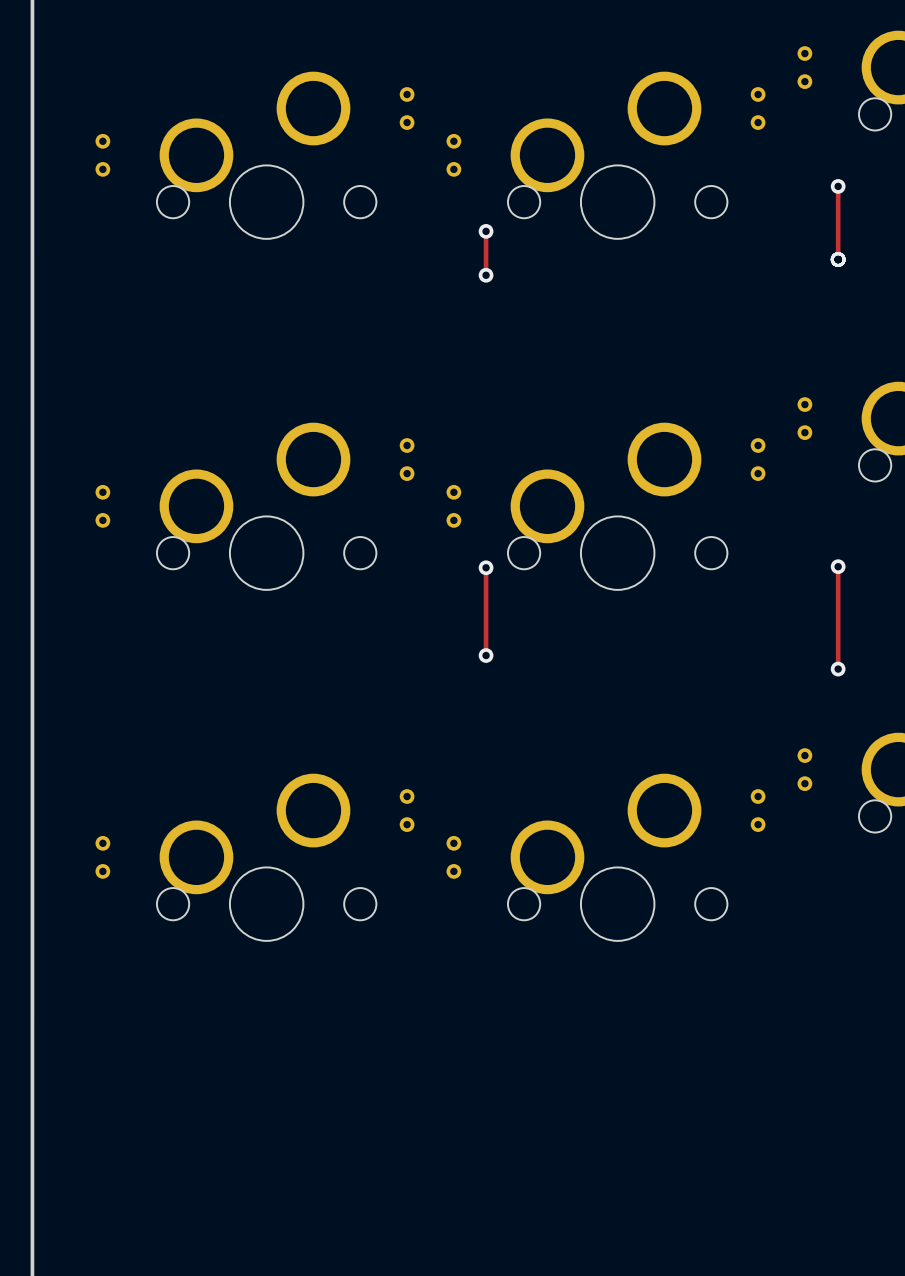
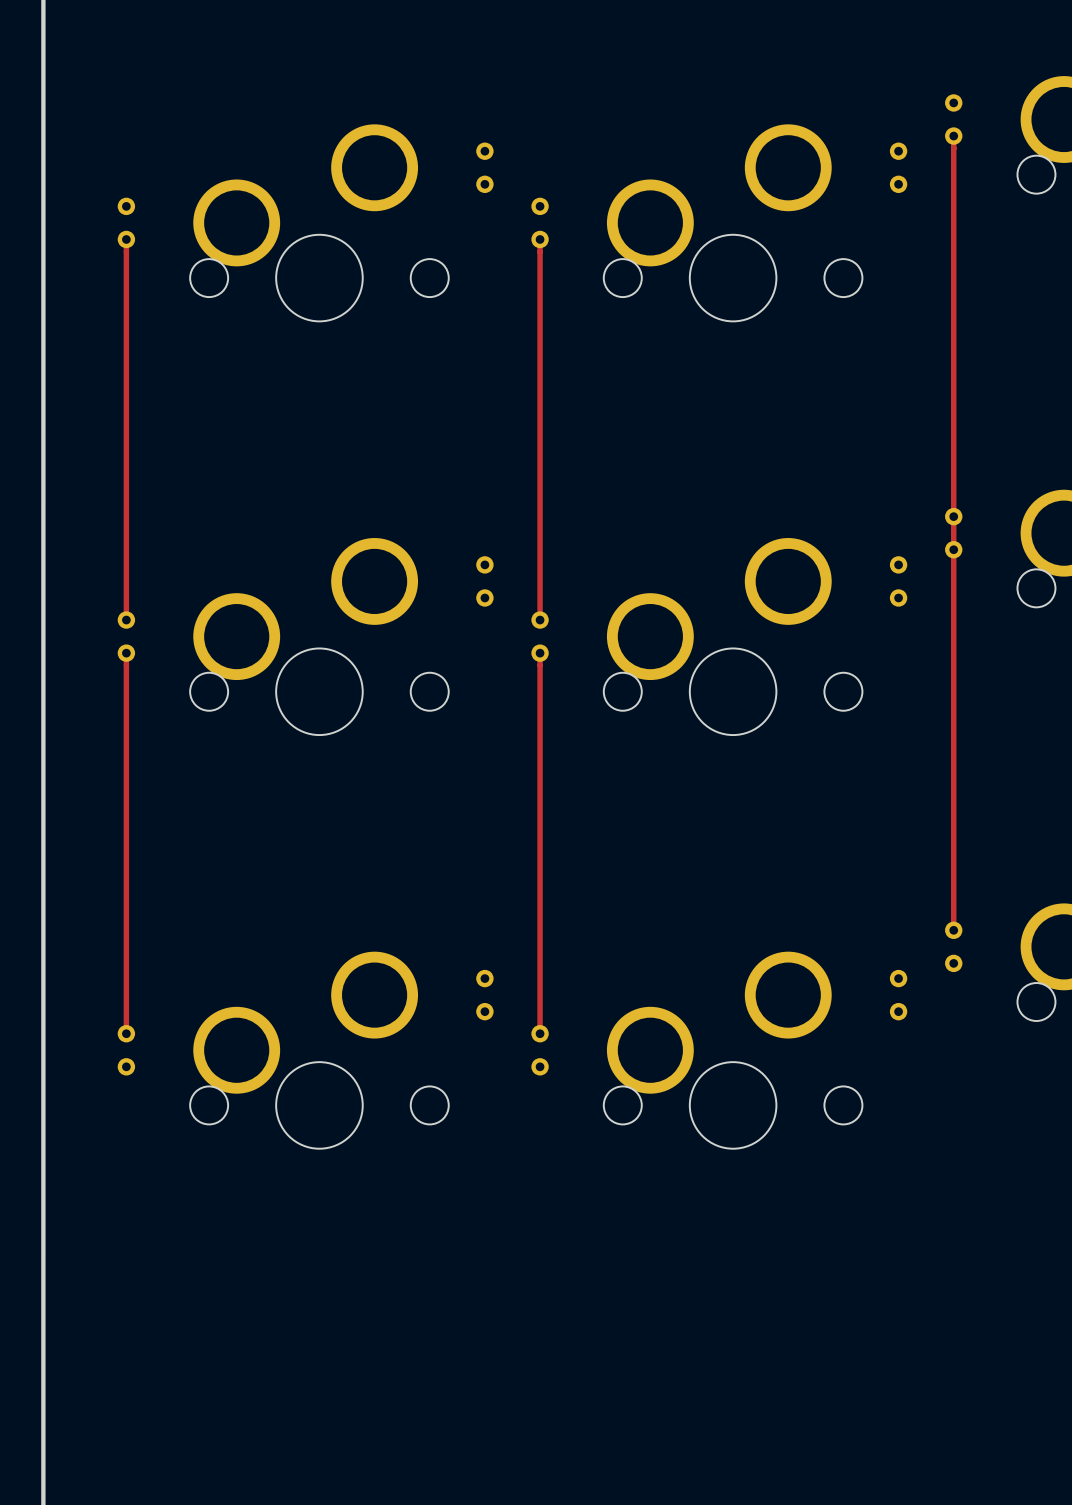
track: none -> (953, 136) (953, 930)
track: none -> (126, 239) (126, 620)
track: none -> (540, 239) (540, 620)
track: (838, 186) (838, 259) -> none
via: (838, 186) -> none
track: (486, 231) (486, 275) -> none
via: (486, 231) -> none
via: (838, 259) -> none
via: (486, 275) -> none
track: none -> (126, 653) (126, 1033)
track: none -> (540, 653) (540, 1033)
track: (838, 566) (838, 669) -> none
via: (838, 566) -> none
track: (486, 567) (486, 655) -> none
via: (486, 567) -> none
via: (486, 655) -> none
via: (838, 669) -> none

